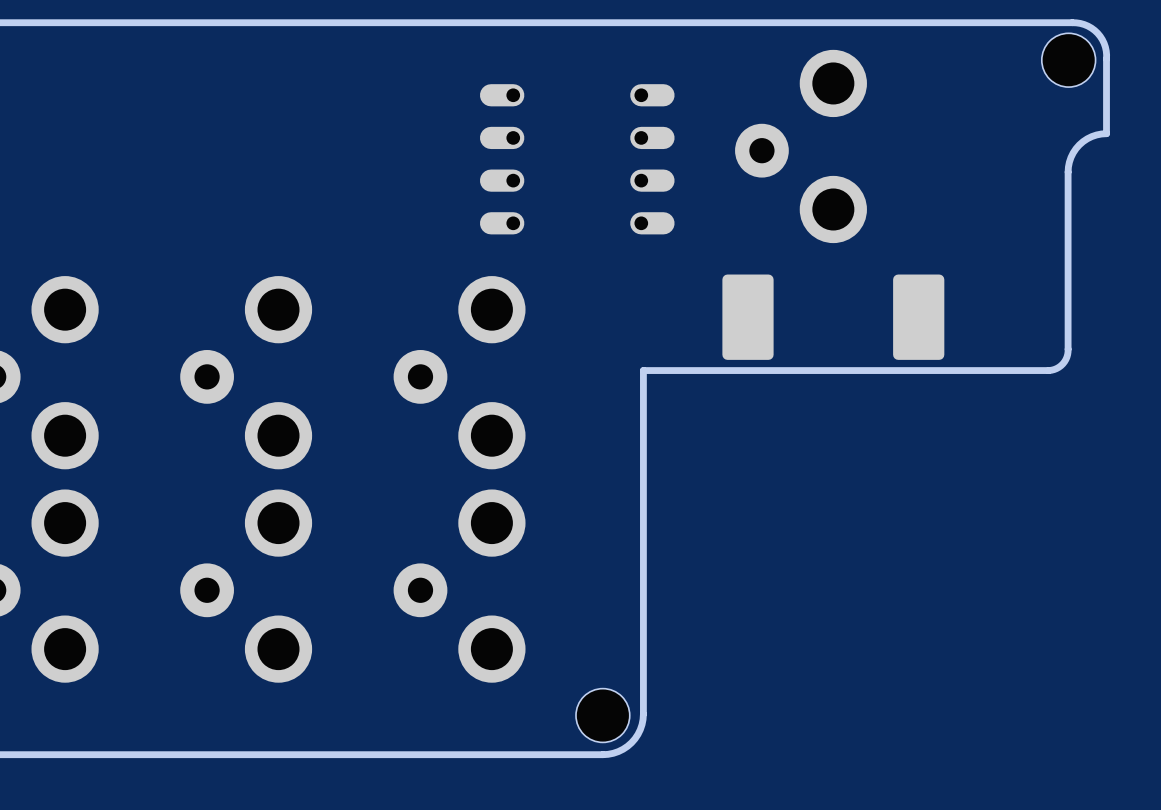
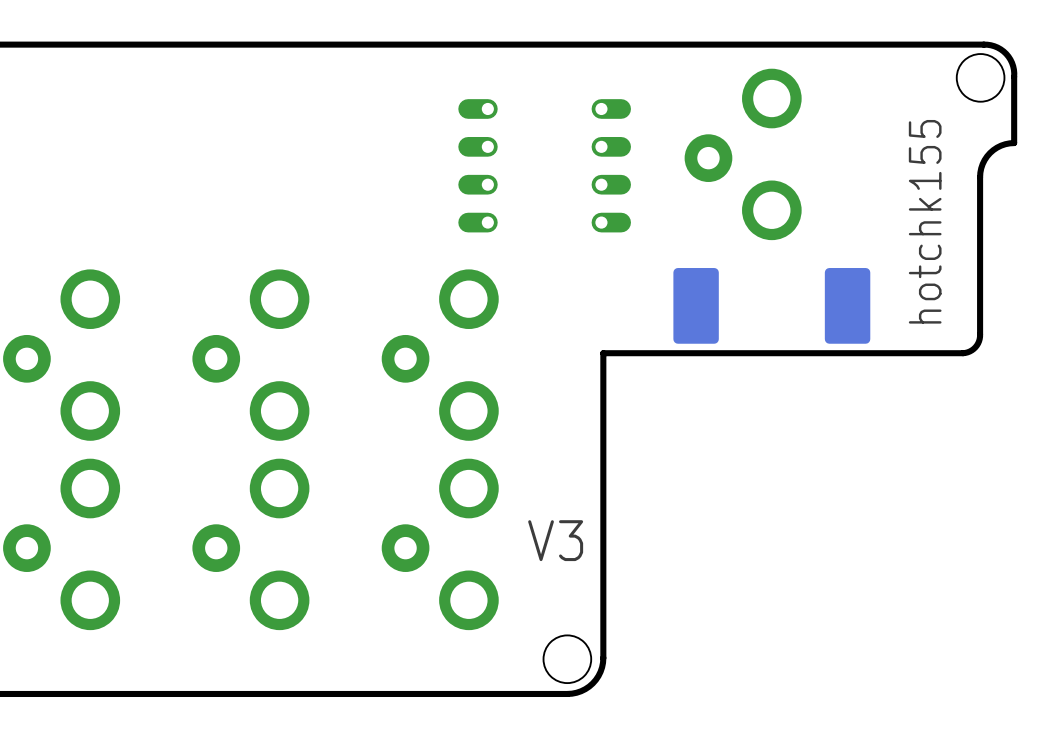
text: none -> hotchk155 (925, 221)
text: none -> V3 (555, 540)

